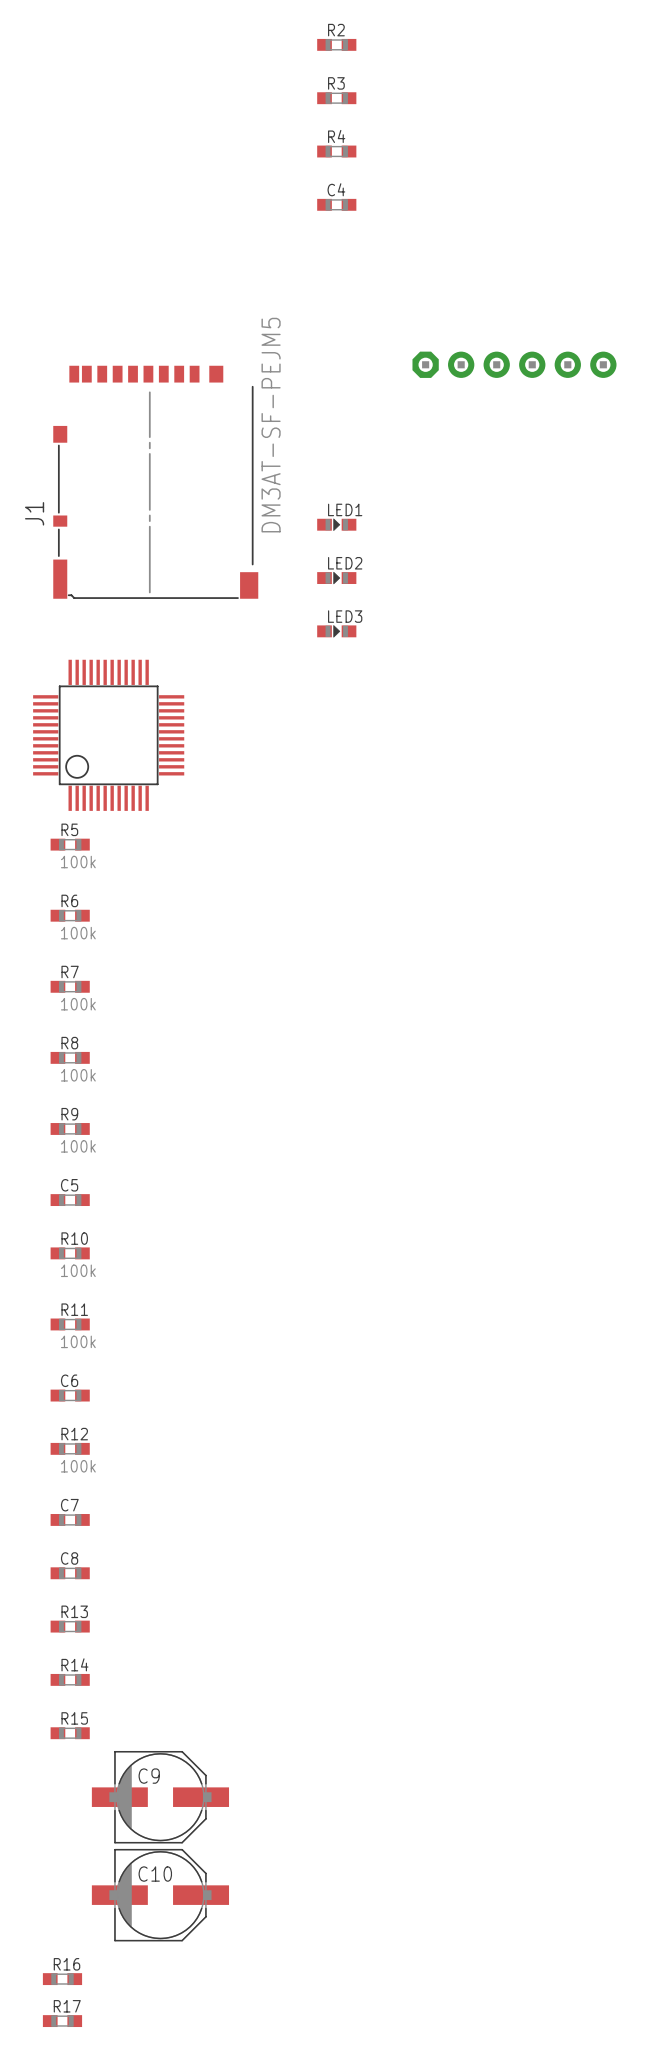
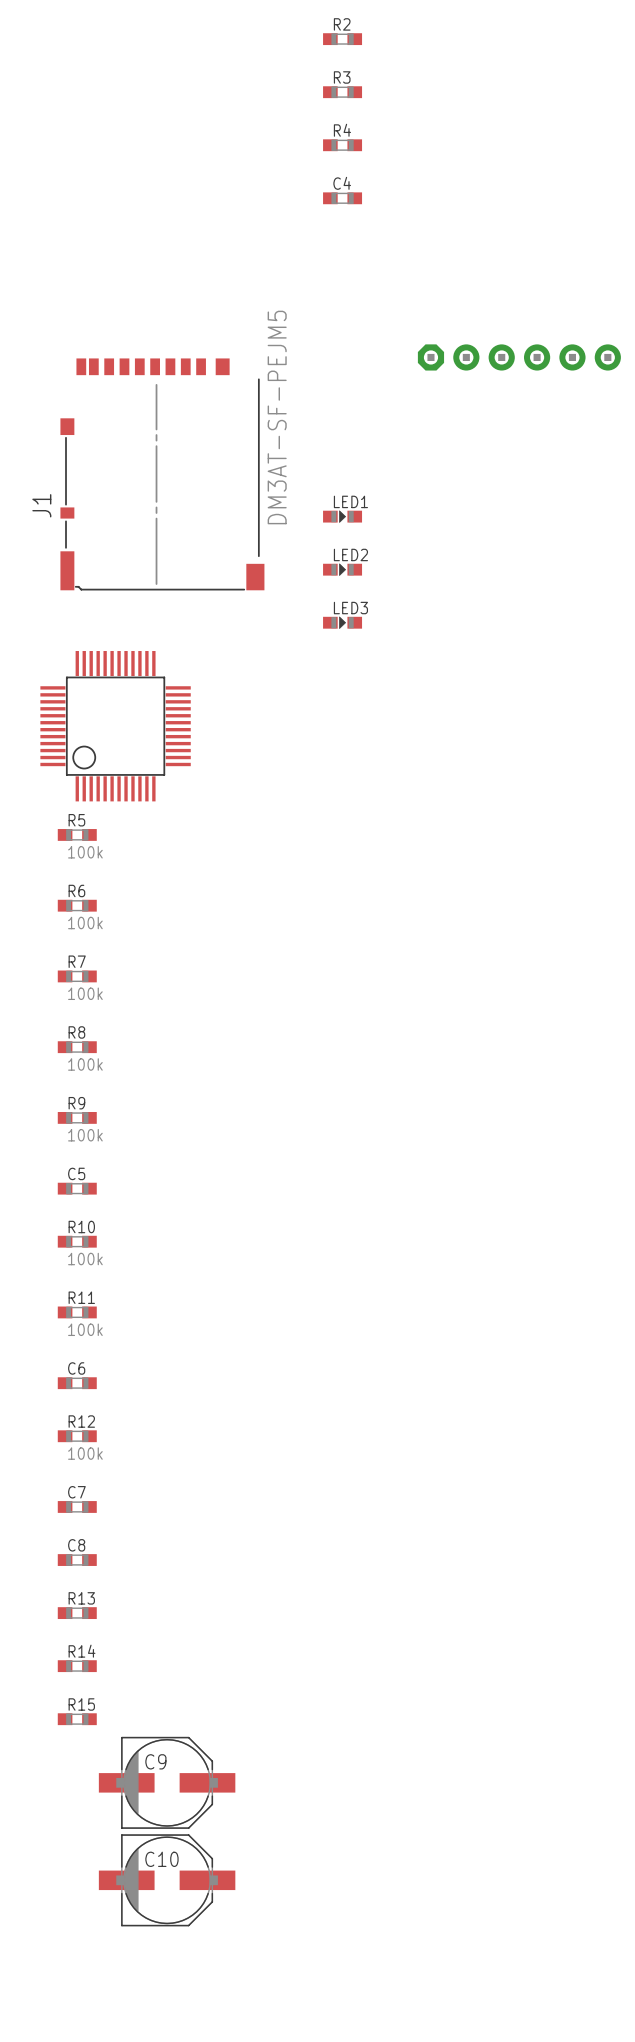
R16: (62, 1979) -> none
R17: (62, 2021) -> none

